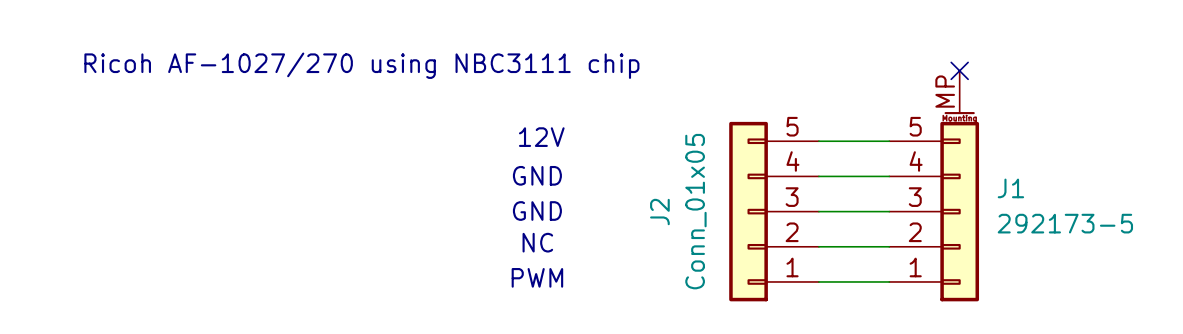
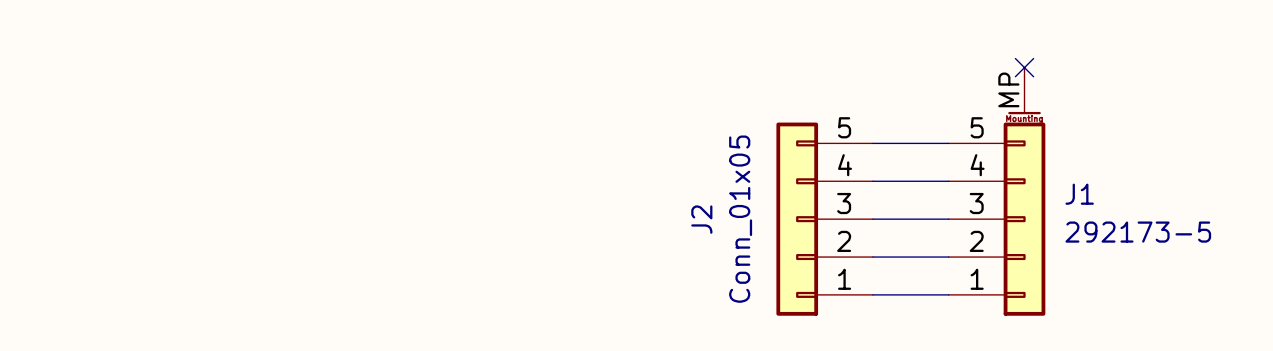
text: Ricoh AF-1027/270 using NBC3111 chip (361, 65) -> none
text: 12V (541, 137) -> none
text: GND (537, 175) -> none
text: GND (537, 211) -> none
text: NC (537, 242) -> none
text: PWM (537, 277) -> none

